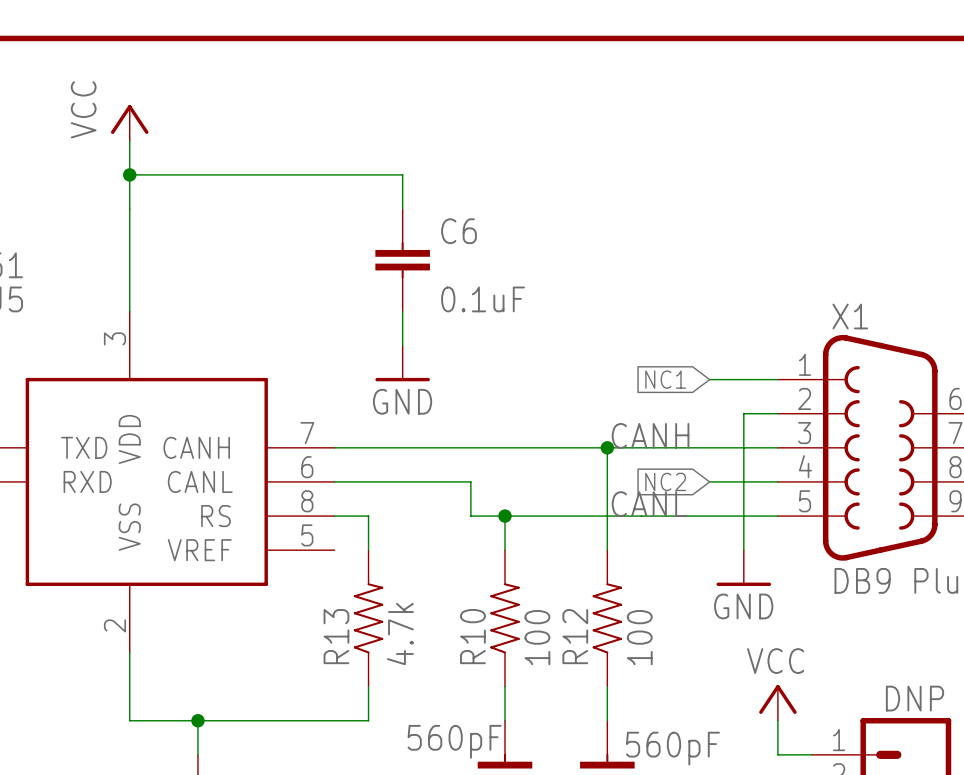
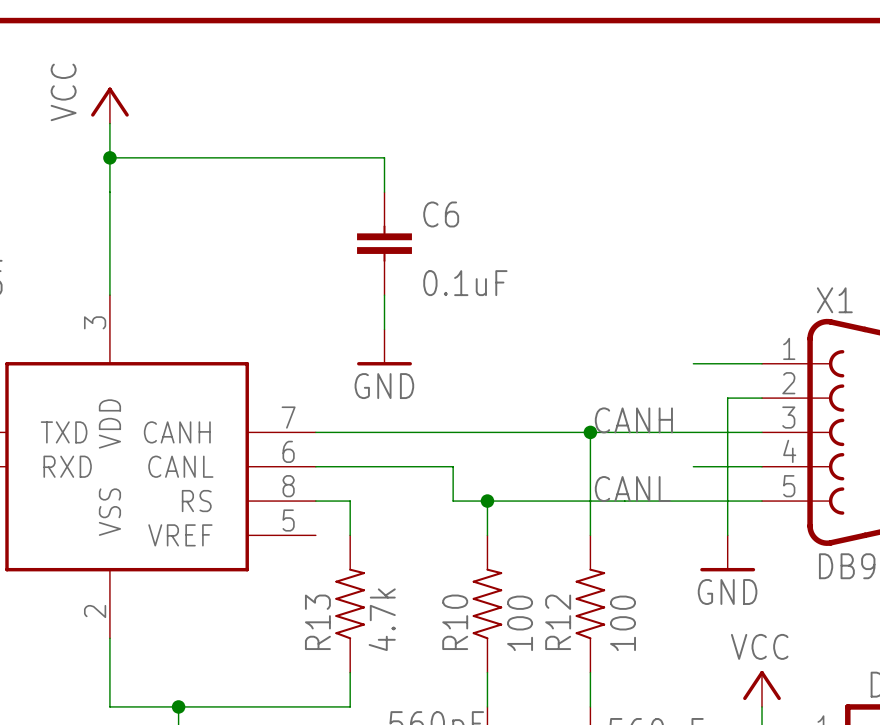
global label: NC1 (665, 379) -> none
global label: NC2 (665, 481) -> none

